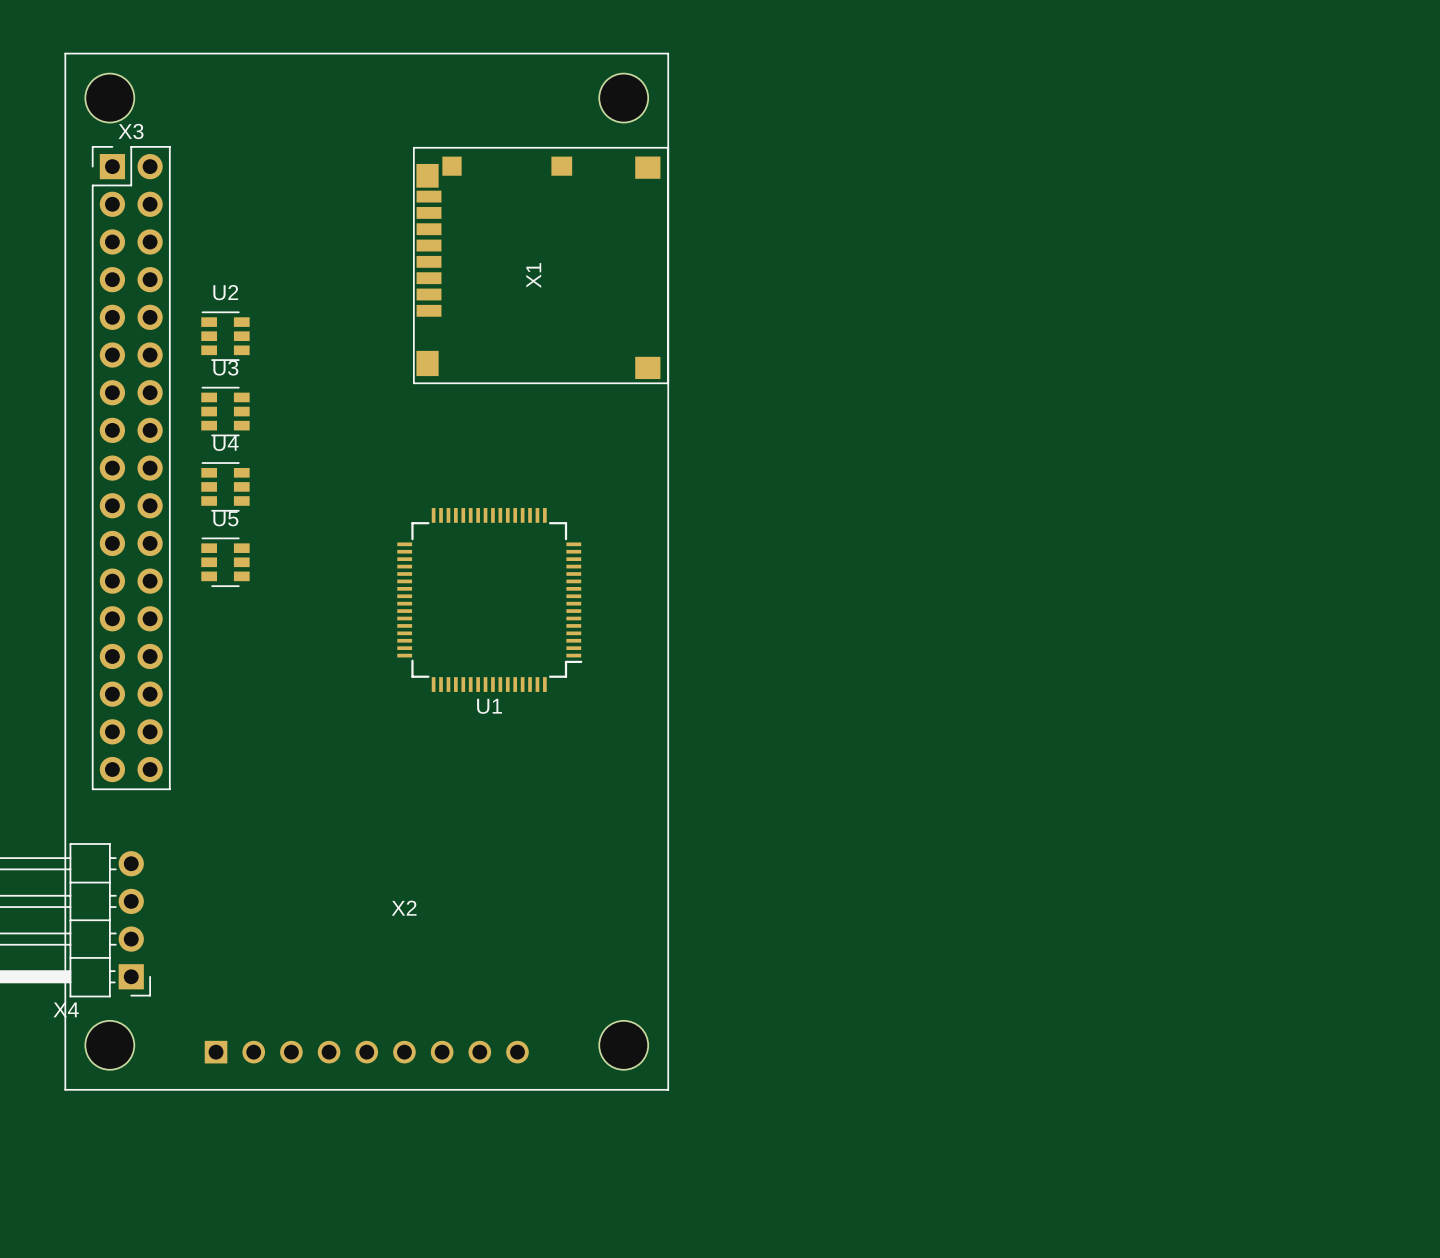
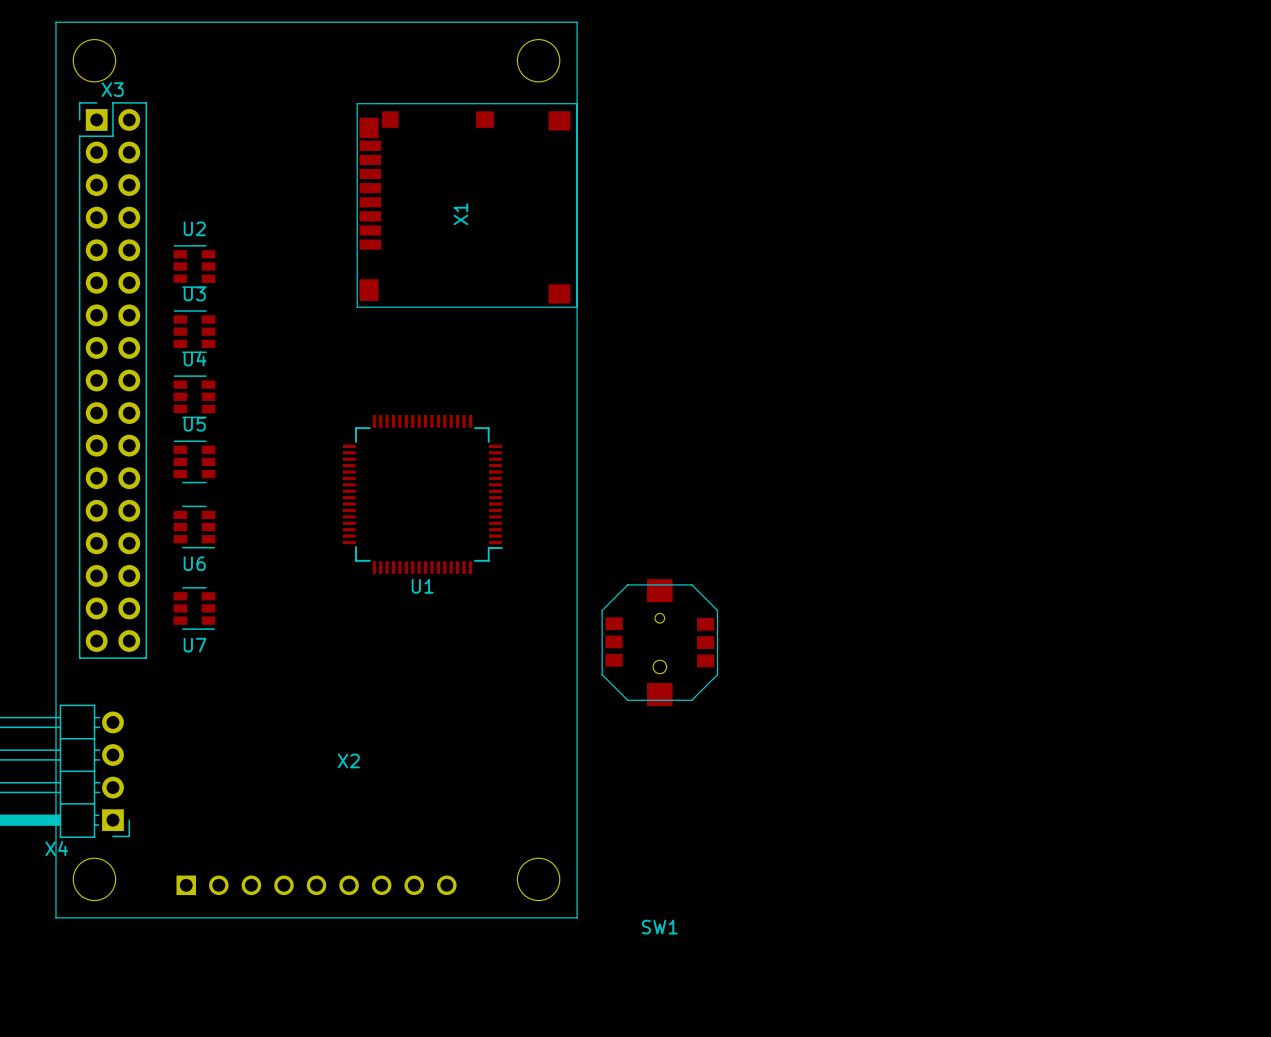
U6: none -> (194, 527)
U7: none -> (194, 608)
SW1: none -> (659, 642)

